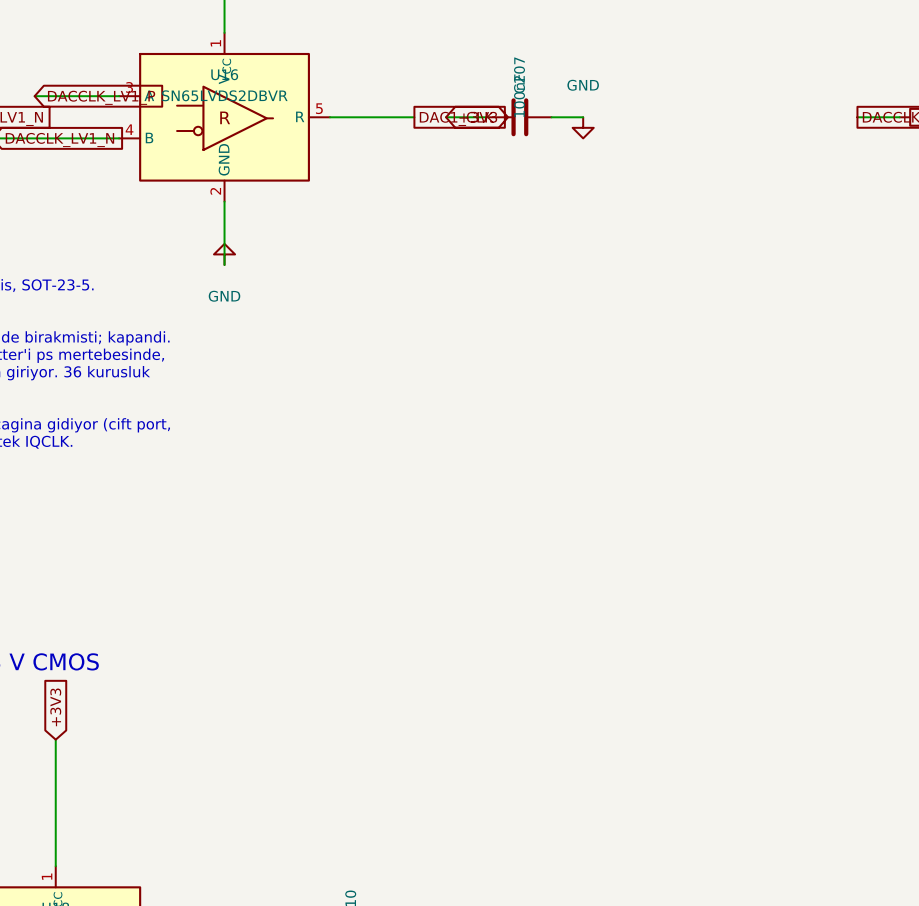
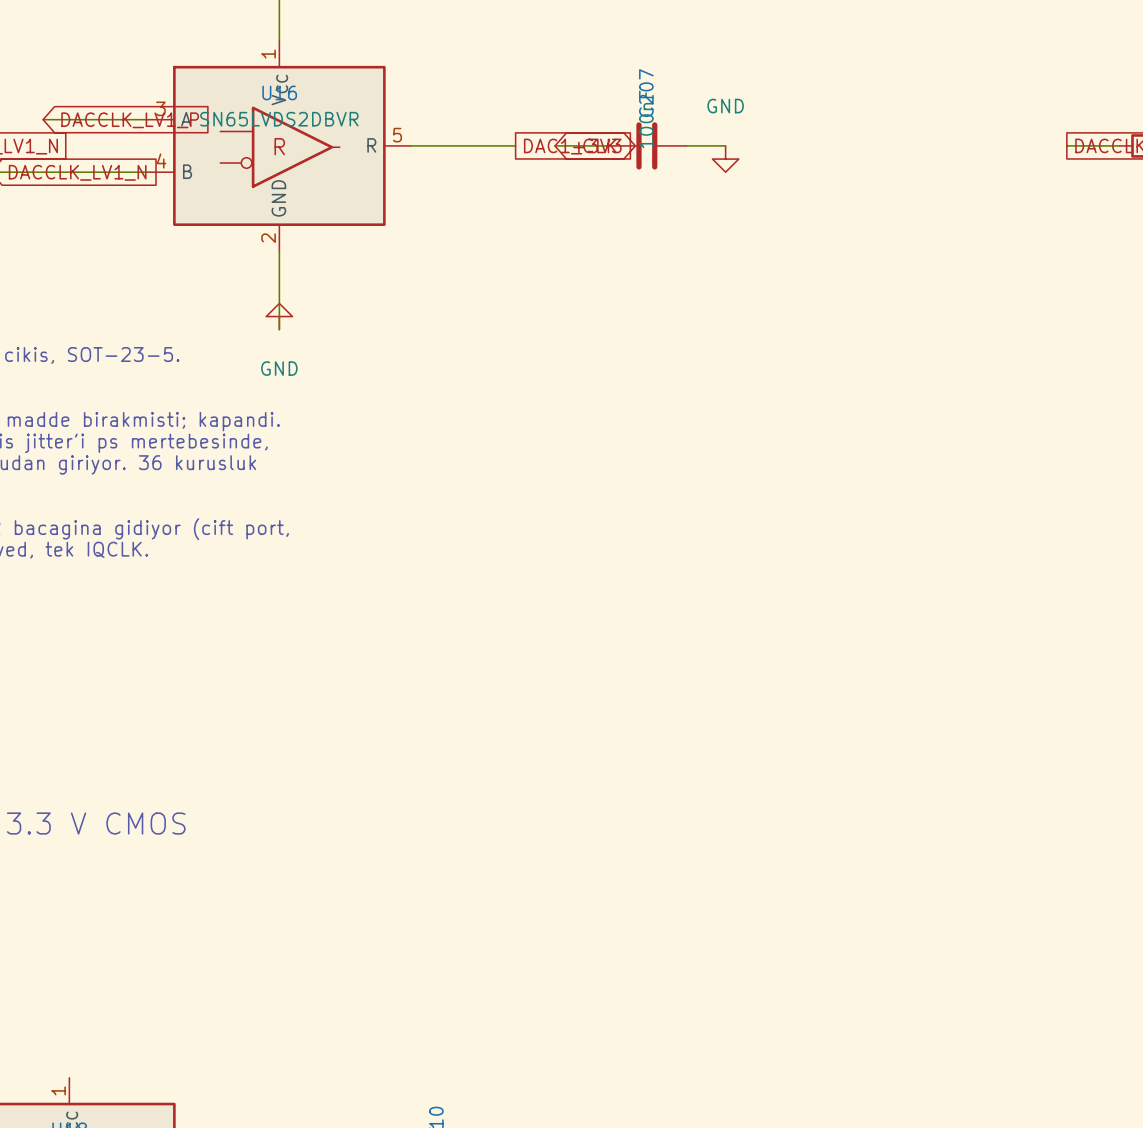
global label: +3V3 (55, 707) -> none
wire: (55, 739) (55, 866) -> none

